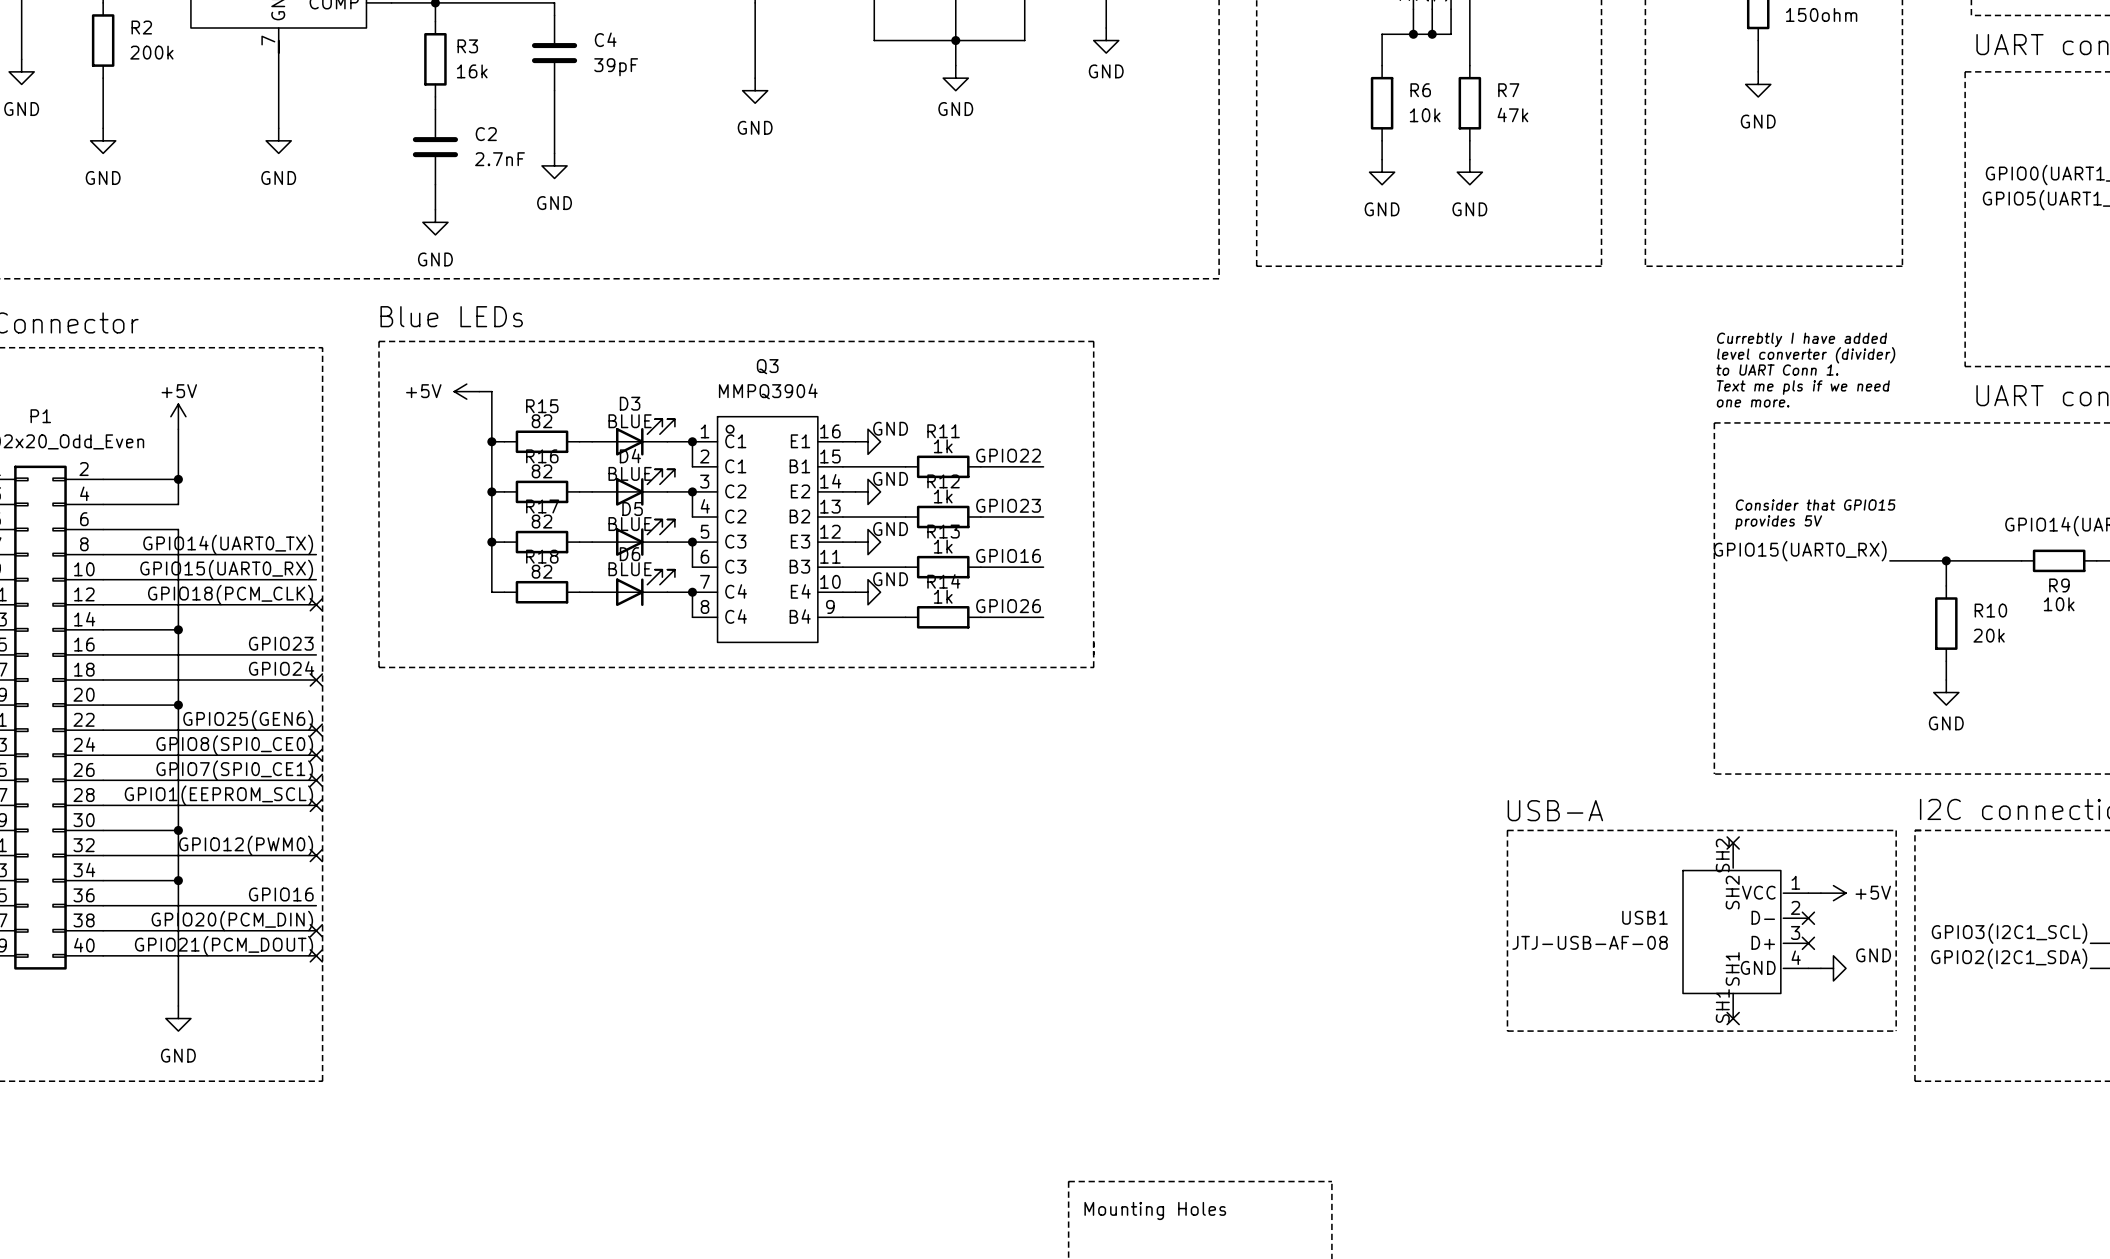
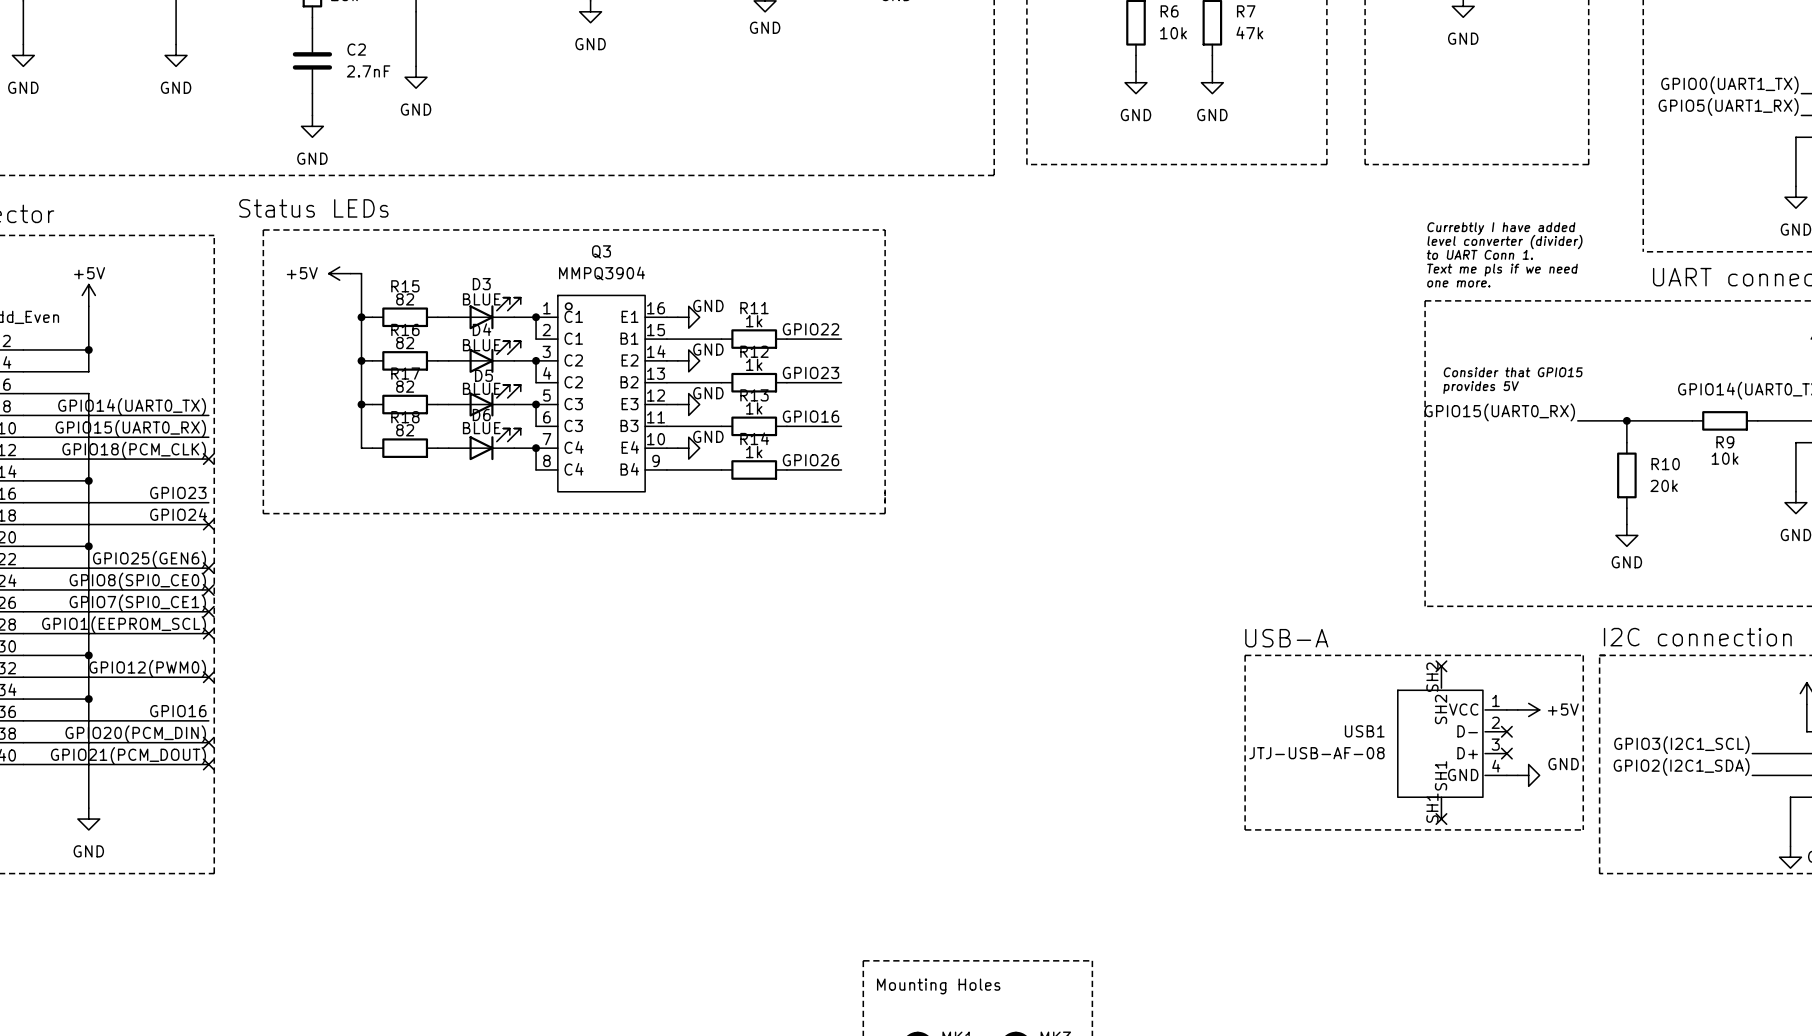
text: Blue LEDs (451, 316) -> Status LEDs (313, 208)

